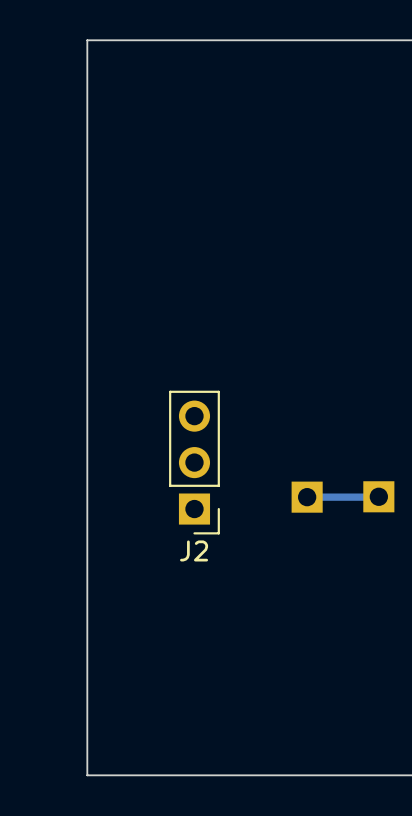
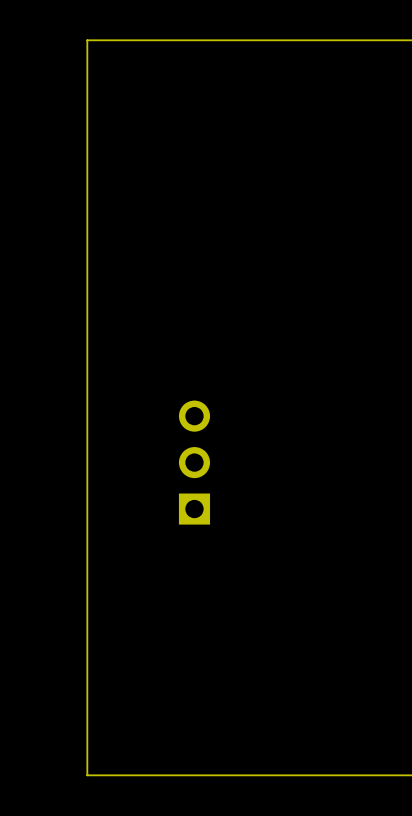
J2 side: bottom (194, 462) -> top (194, 462)
track: (378, 496) (307, 497) -> none
part: (378, 496) -> none
part: (307, 497) -> none

